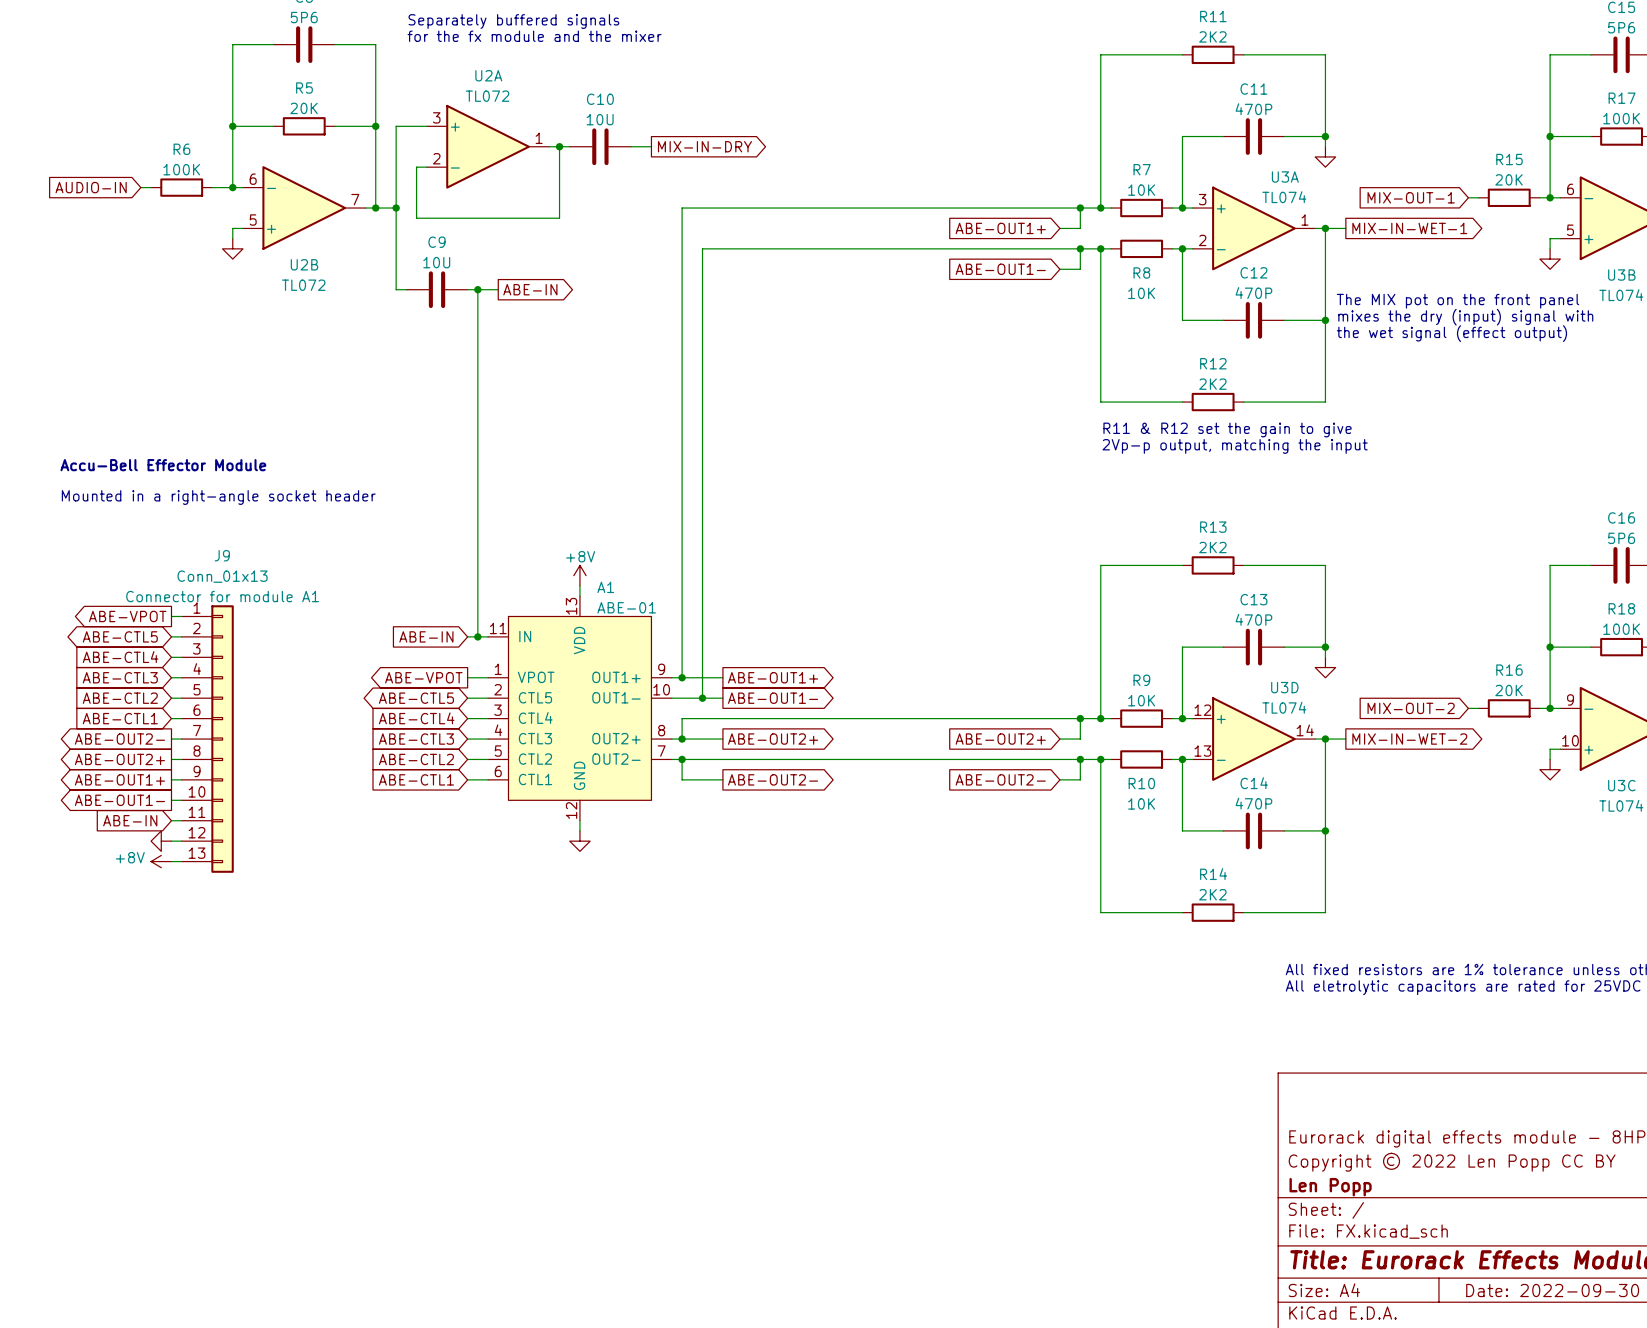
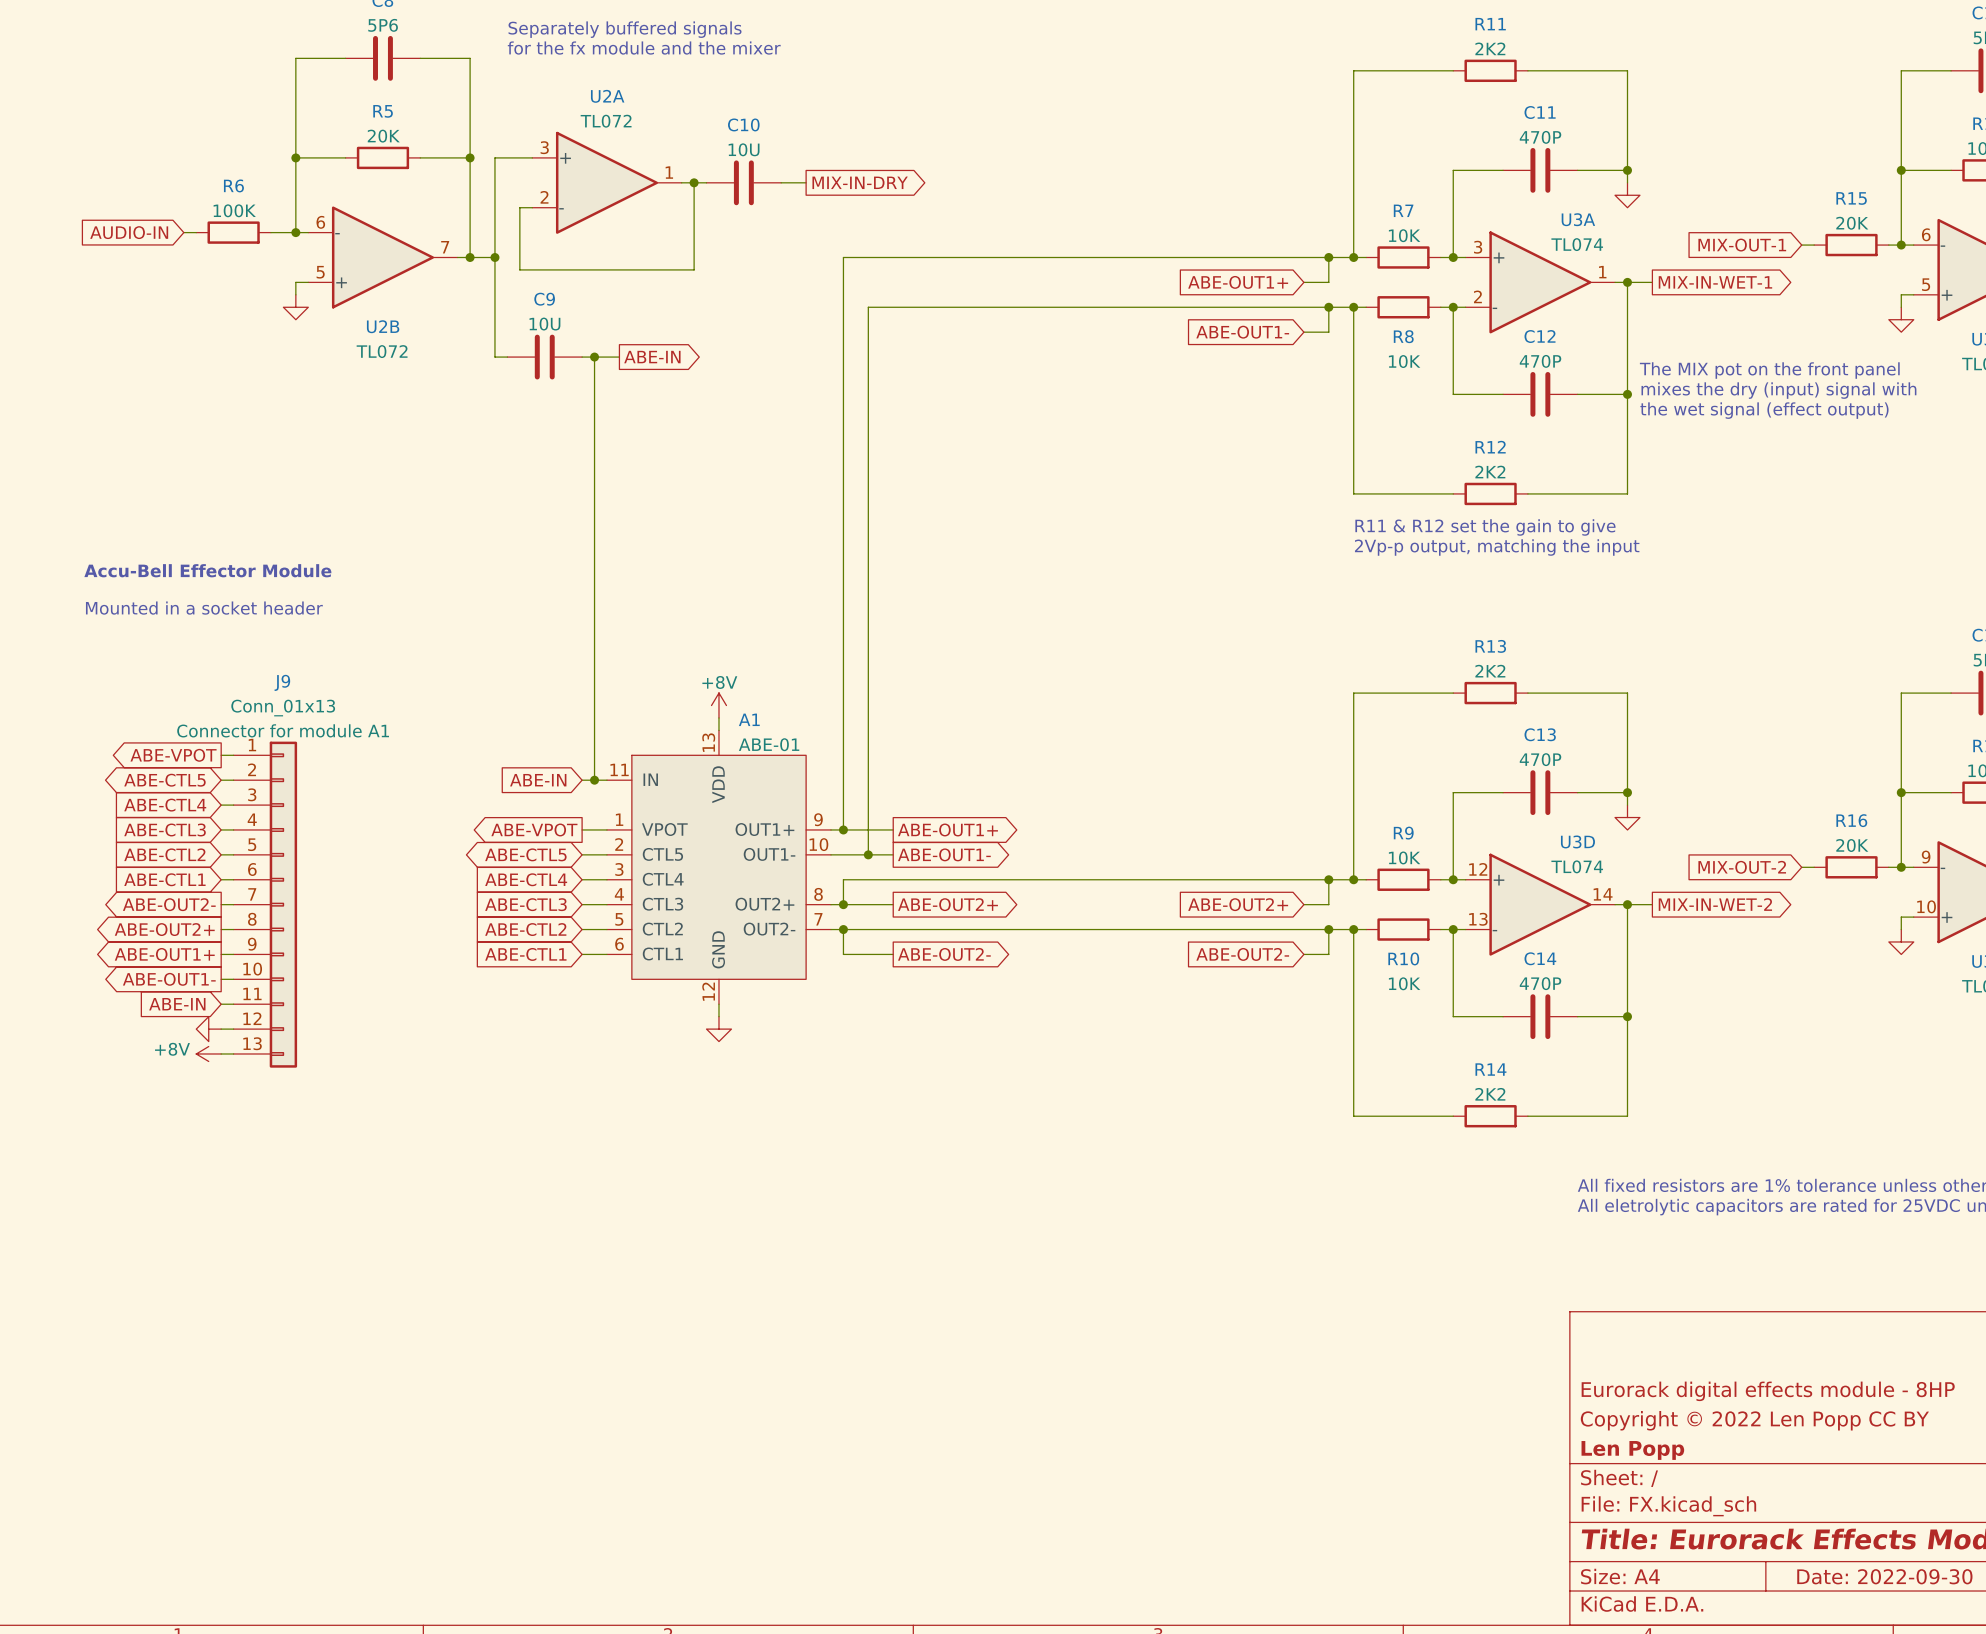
text: Mounted in a right-angle socket header (218, 497) -> Mounted in a socket header (204, 608)

